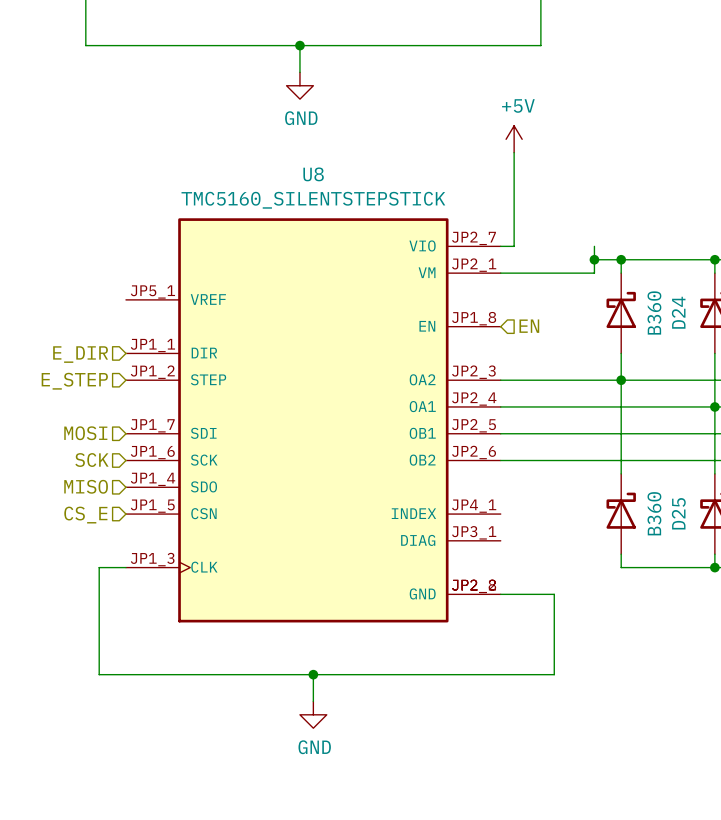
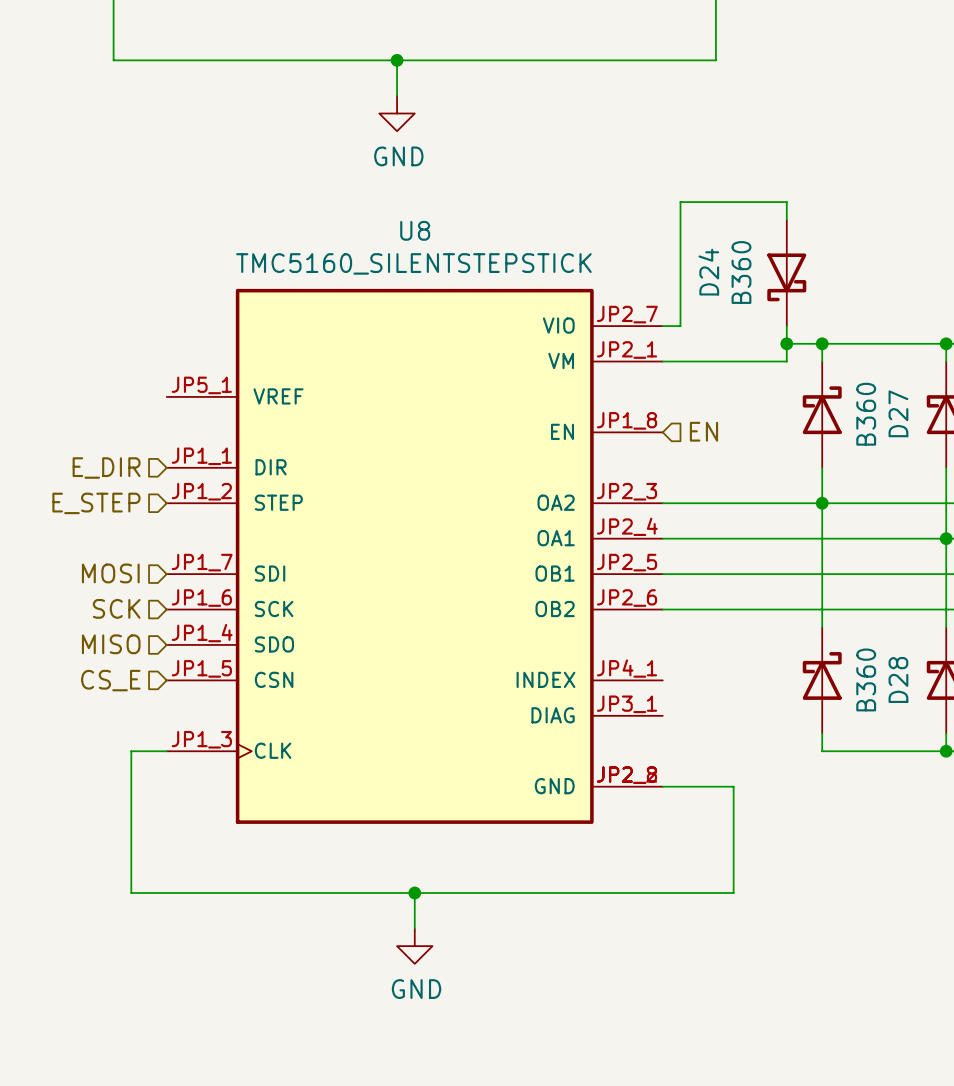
power symbol: +5V (514, 139) -> none
wire: none -> (680, 202) (786, 202) (786, 219)
D24: none -> B360 (786, 272)
D24 name: D24 (678, 312) -> D27 (898, 413)
D25 name: D25 (678, 513) -> D28 (898, 679)

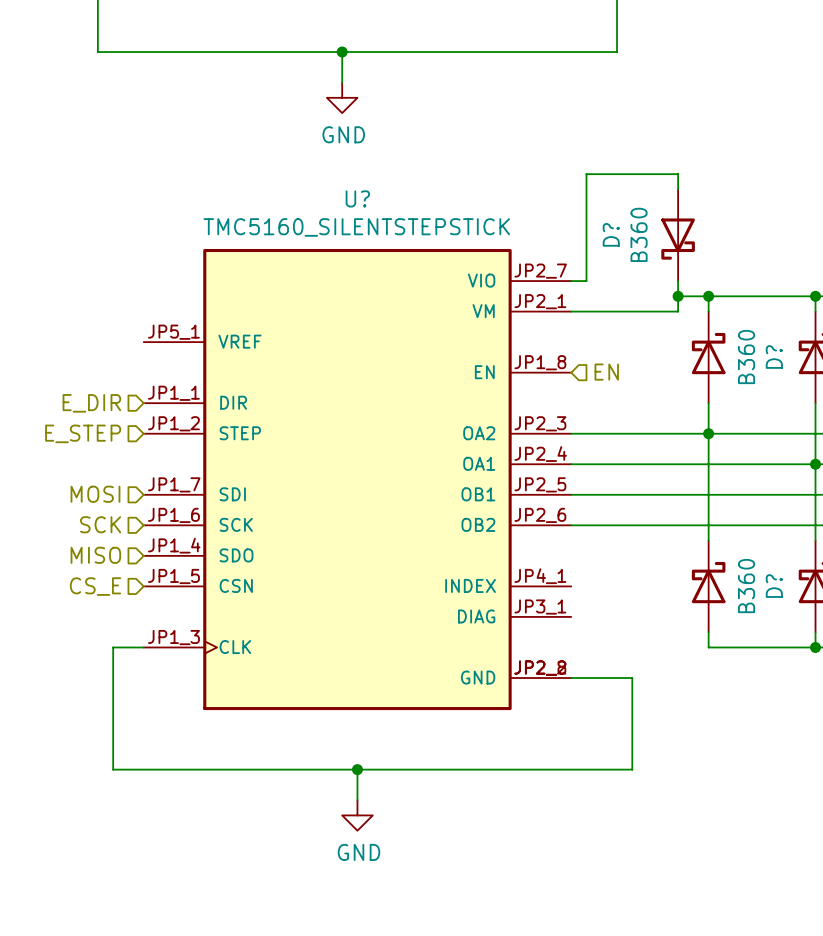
U8 name: U8 (415, 230) -> U? (357, 198)
D24 name: D24 (708, 272) -> D? (611, 234)
D27 name: D27 (898, 413) -> D? (774, 357)
D28 name: D28 (898, 679) -> D? (774, 586)

